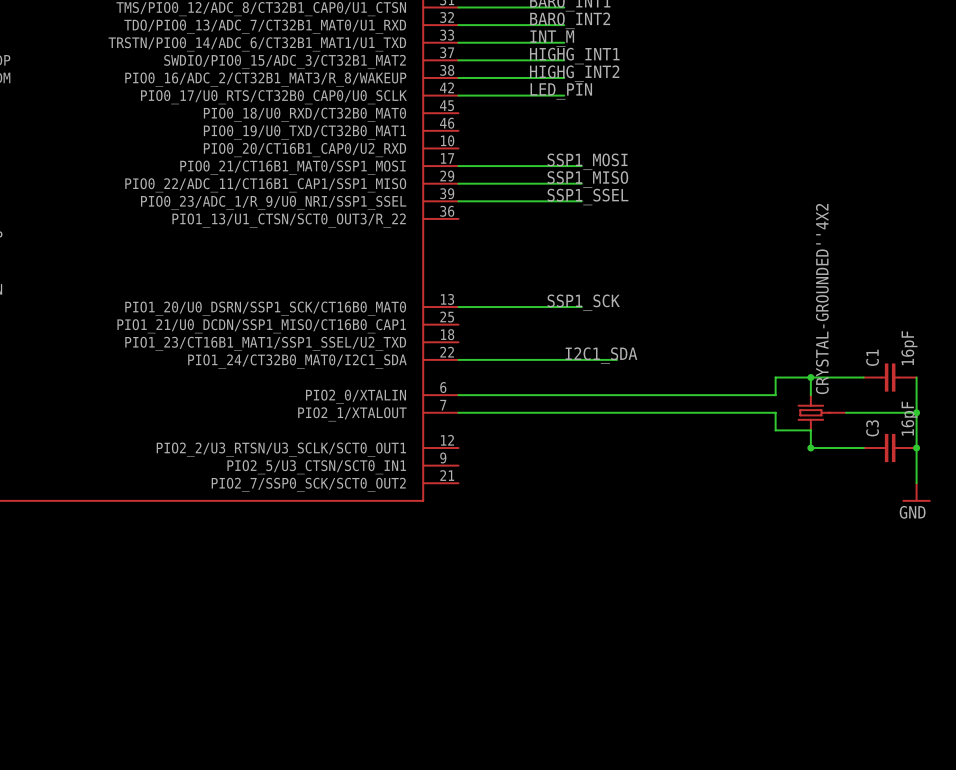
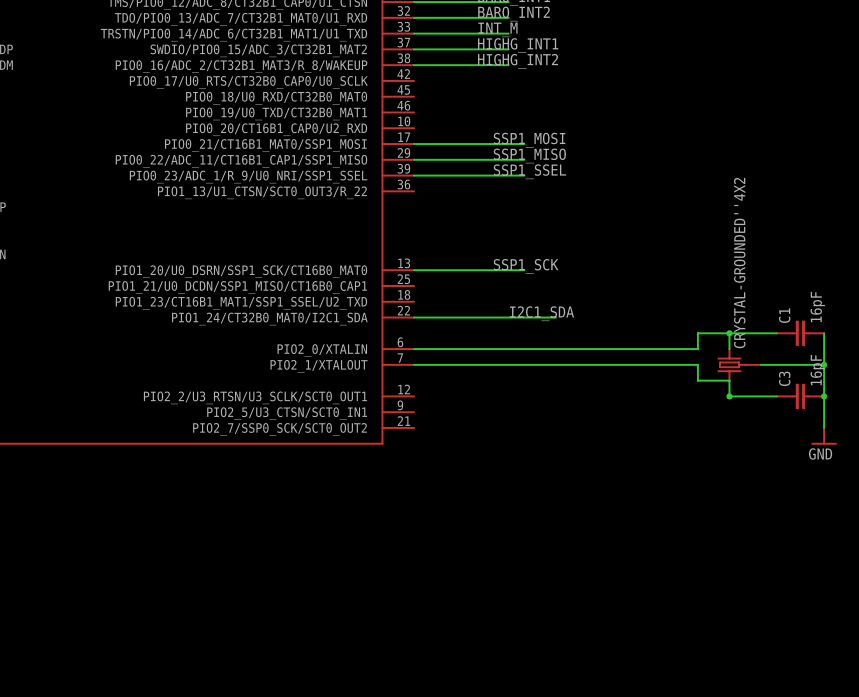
label: LED_PIN (561, 91) -> none
wire: (458, 95) (564, 95) -> none

